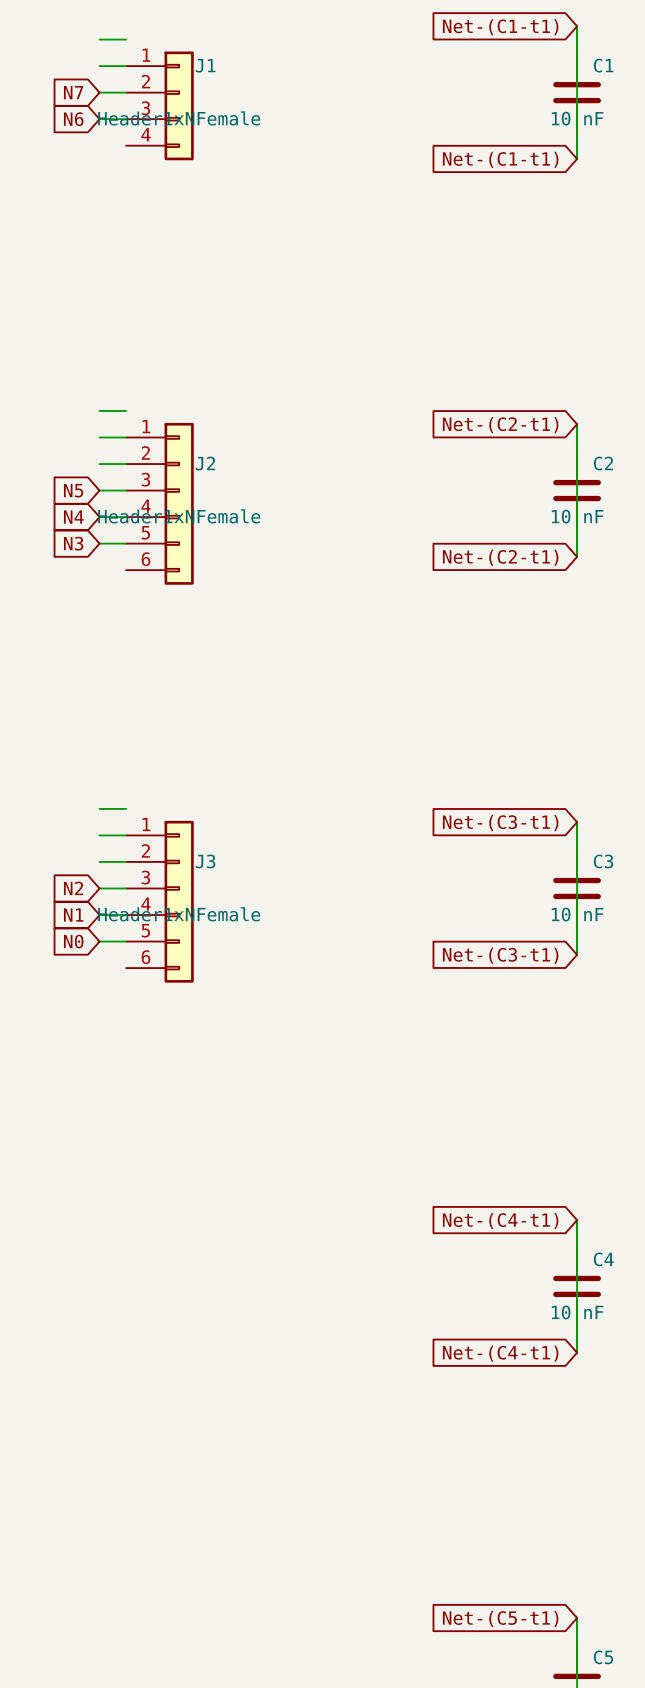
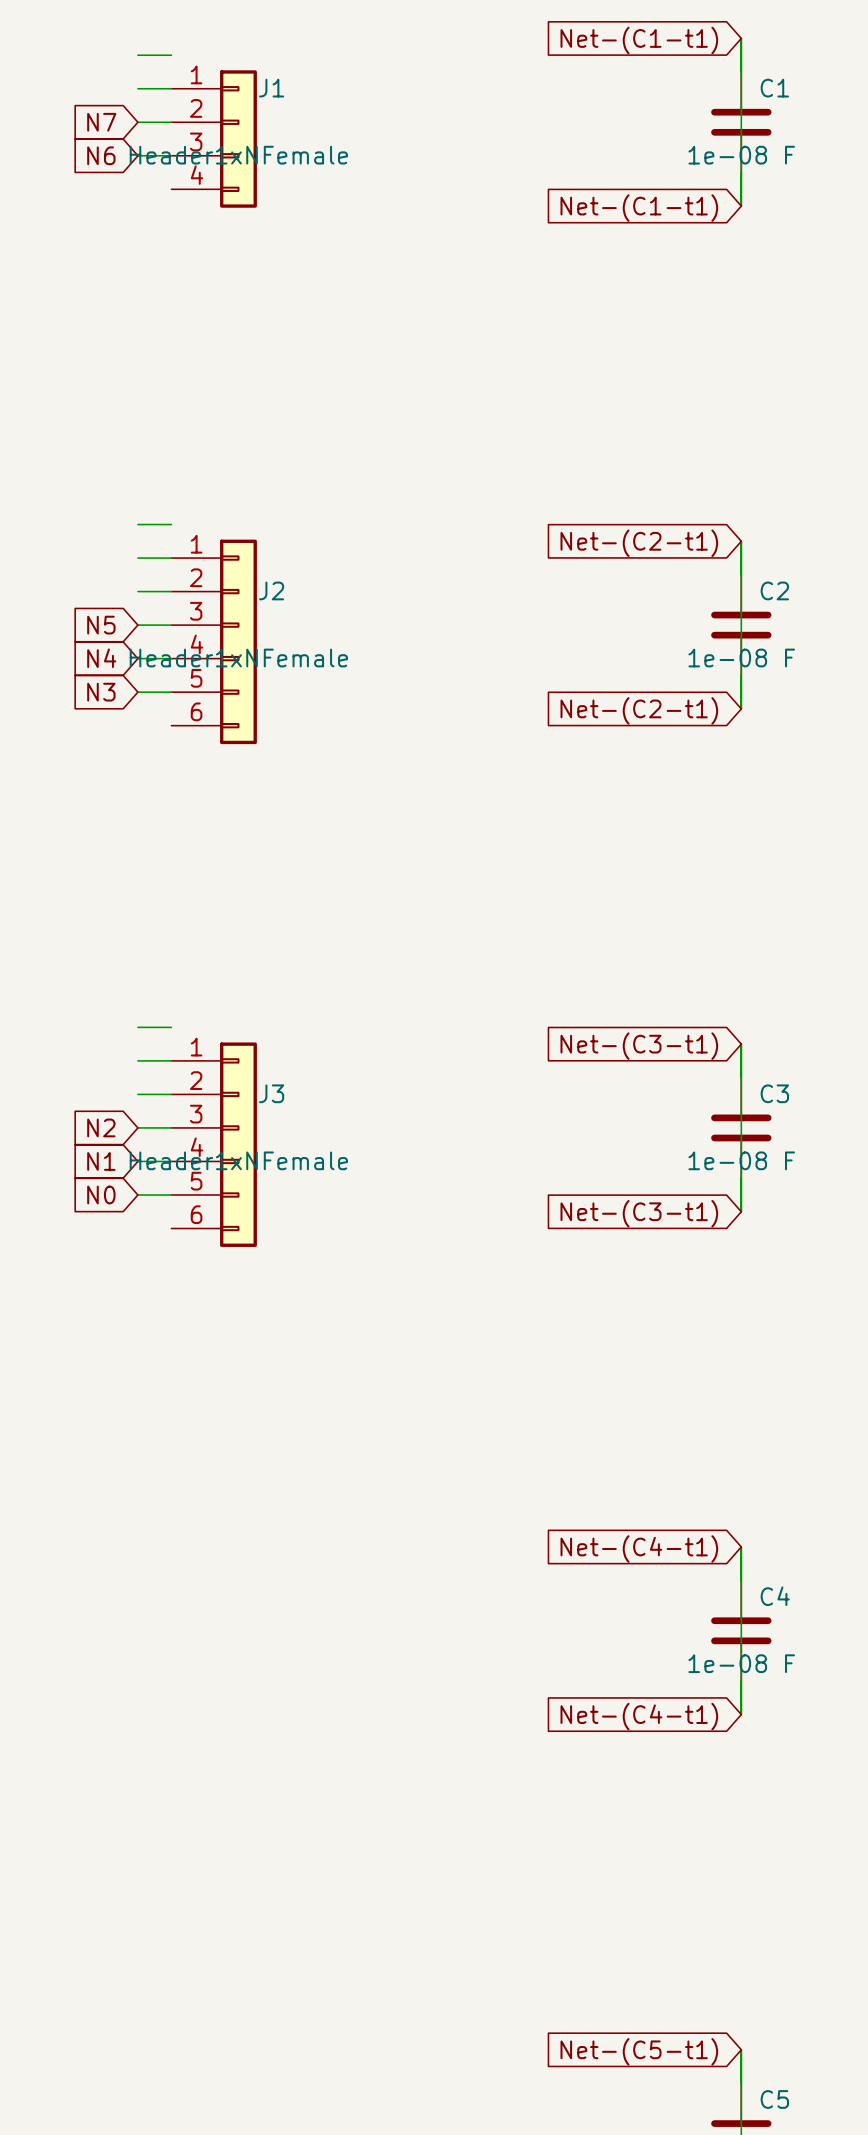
C1 value: 10 nF (577, 118) -> 1e-08 F (741, 155)
C2 value: 10 nF (577, 516) -> 1e-08 F (741, 658)
C3 value: 10 nF (577, 914) -> 1e-08 F (741, 1160)
C4 value: 10 nF (577, 1312) -> 1e-08 F (741, 1663)

